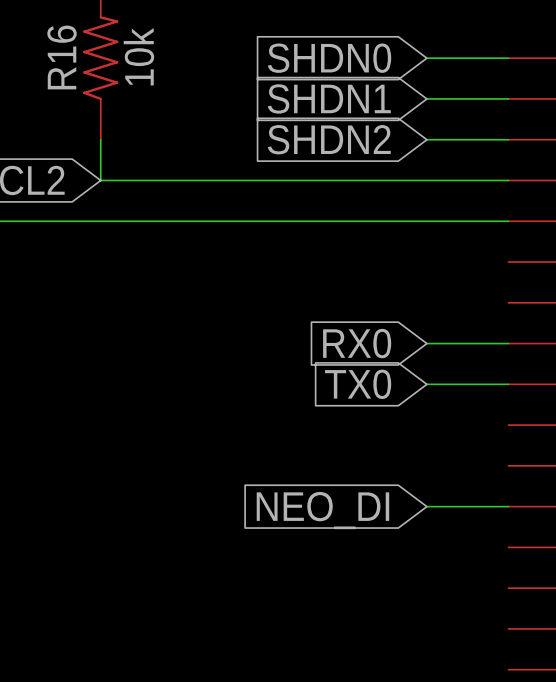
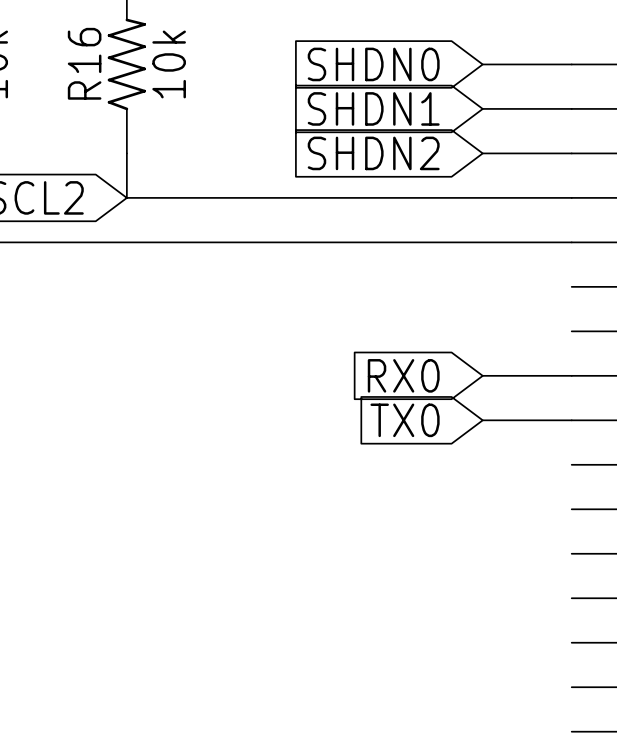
wire: (426, 506) (508, 506) -> none
global label: NEO_DI (322, 510) -> none

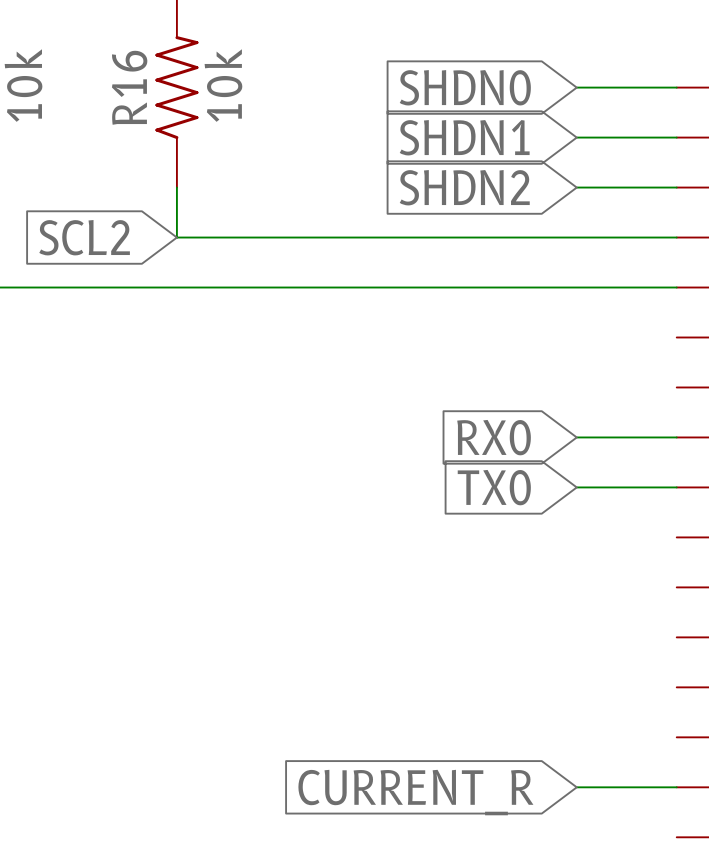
wire: none -> (576, 787) (676, 787)
global label: none -> CURRENT_R (415, 792)

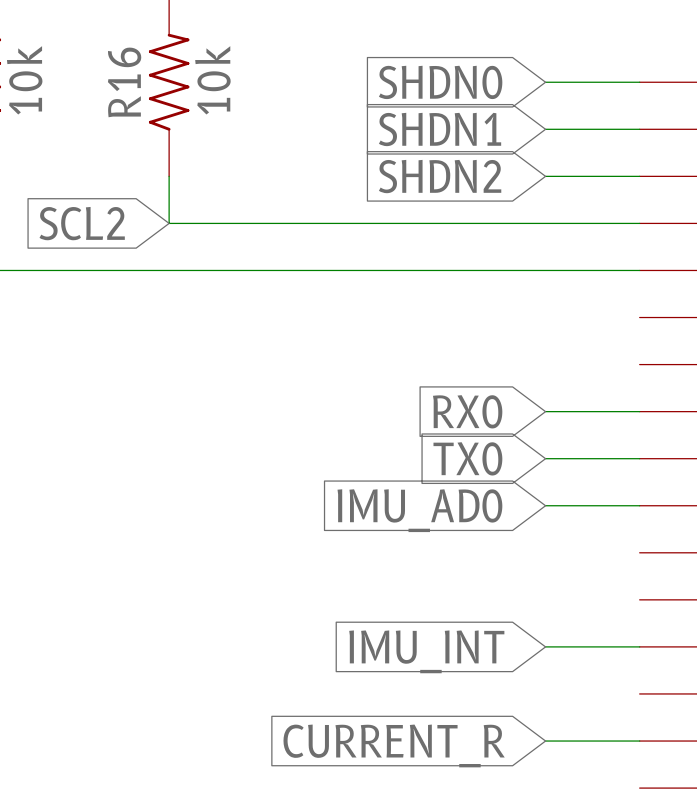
wire: none -> (545, 505) (639, 505)
global label: none -> IMU_AD0 (419, 510)
wire: none -> (545, 646) (639, 646)
global label: none -> IMU_INT (426, 651)

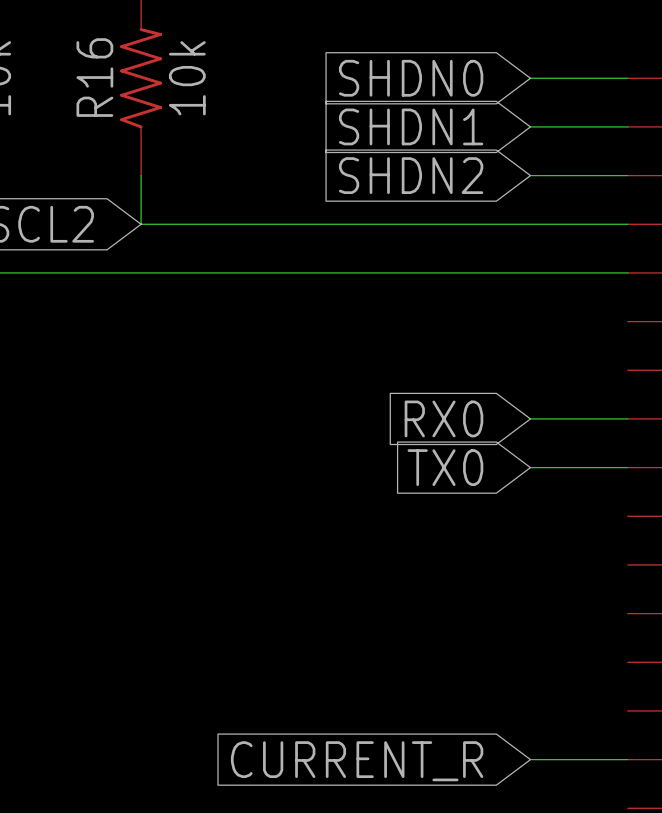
wire: (545, 505) (639, 505) -> none
global label: IMU_AD0 (419, 510) -> none
wire: (545, 646) (639, 646) -> none
global label: IMU_INT (426, 651) -> none

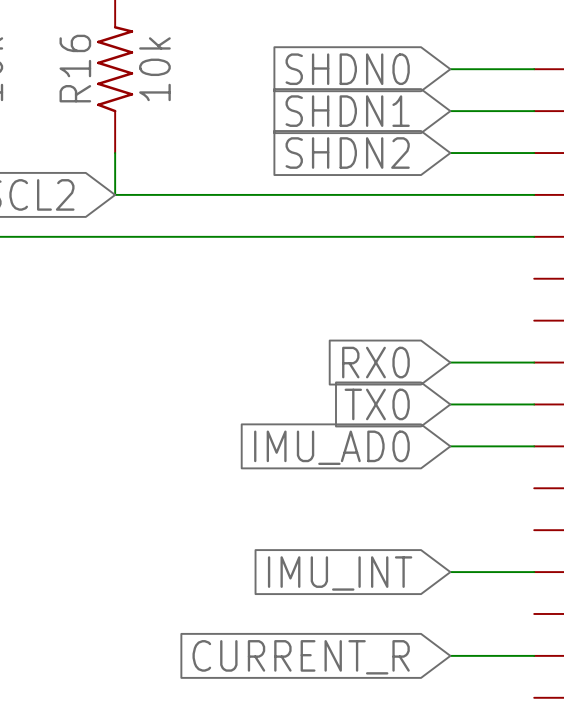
wire: none -> (450, 446) (534, 446)
global label: none -> IMU_AD0 (331, 447)
wire: none -> (450, 572) (534, 572)
global label: none -> IMU_INT (340, 573)

